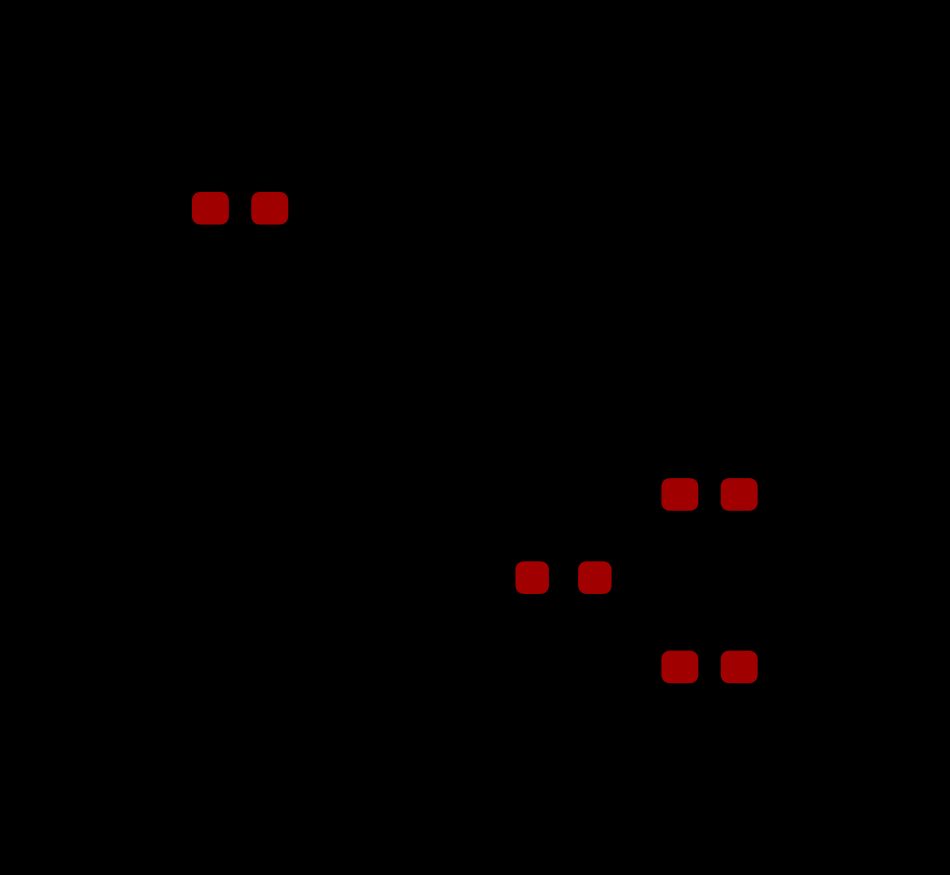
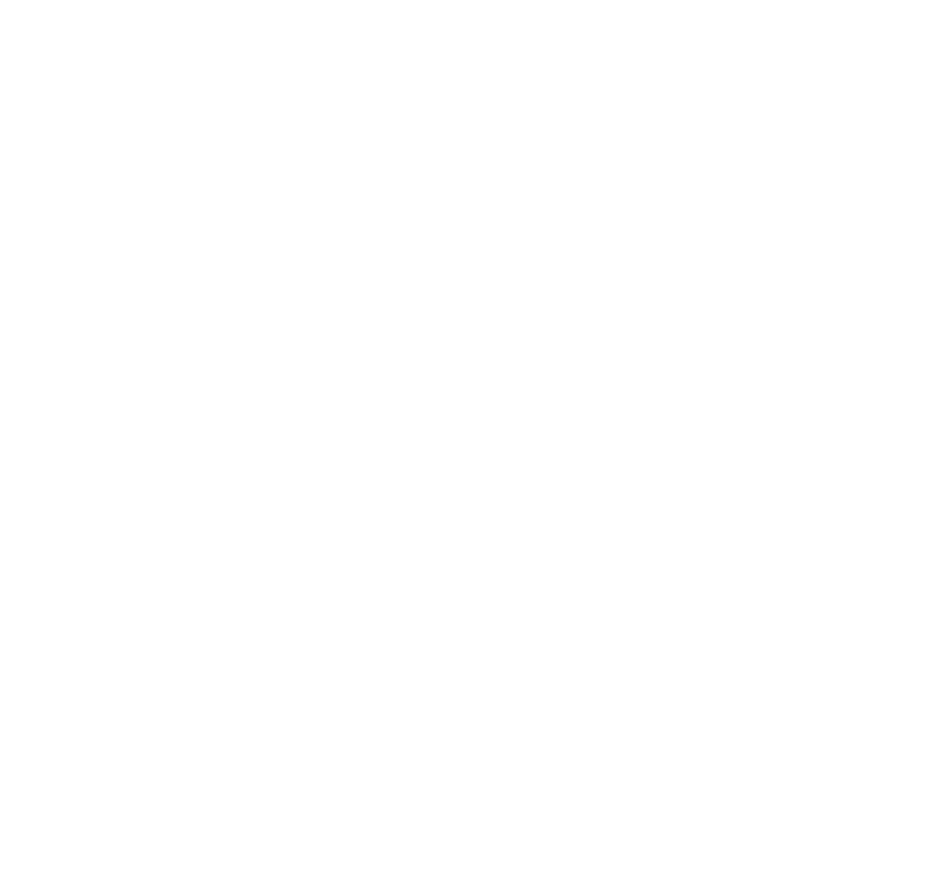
part: (240, 208) -> none
part: (709, 494) -> none
part: (563, 577) -> none
part: (709, 666) -> none

